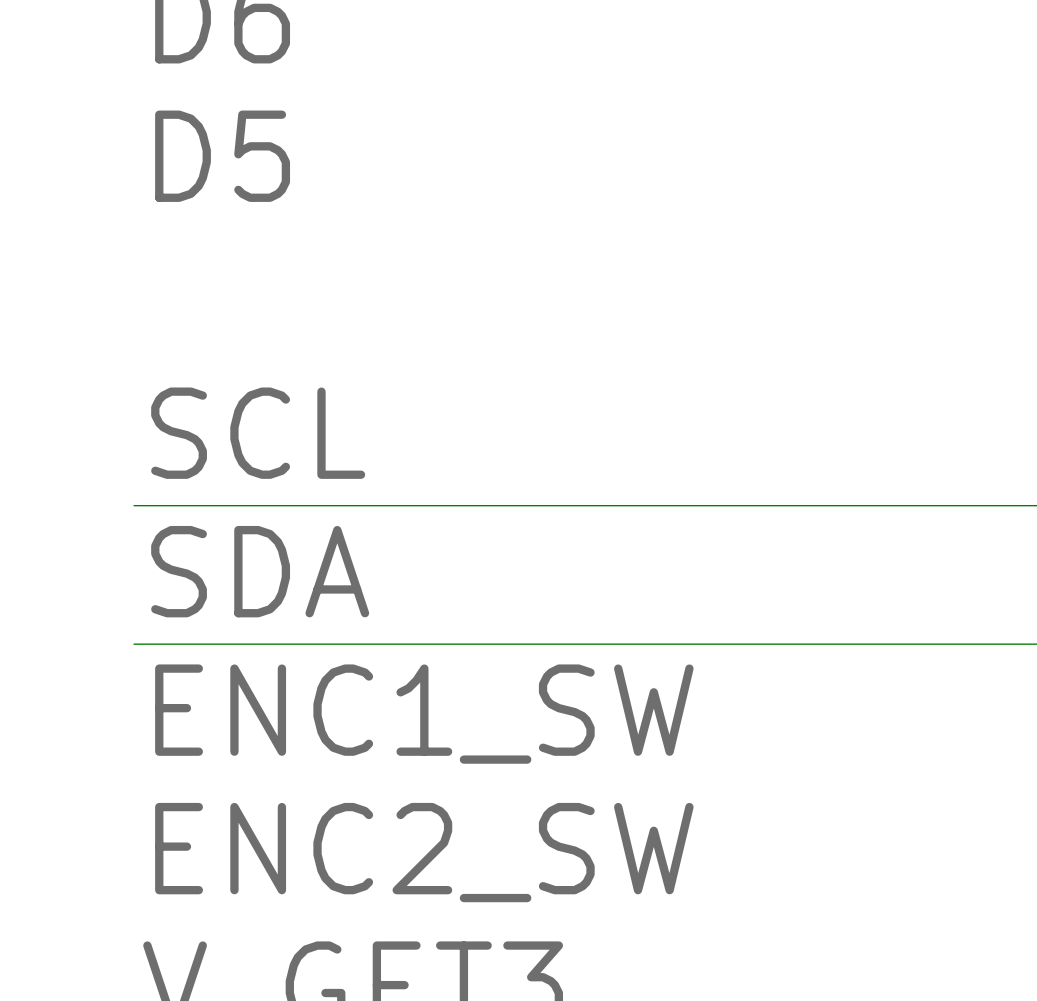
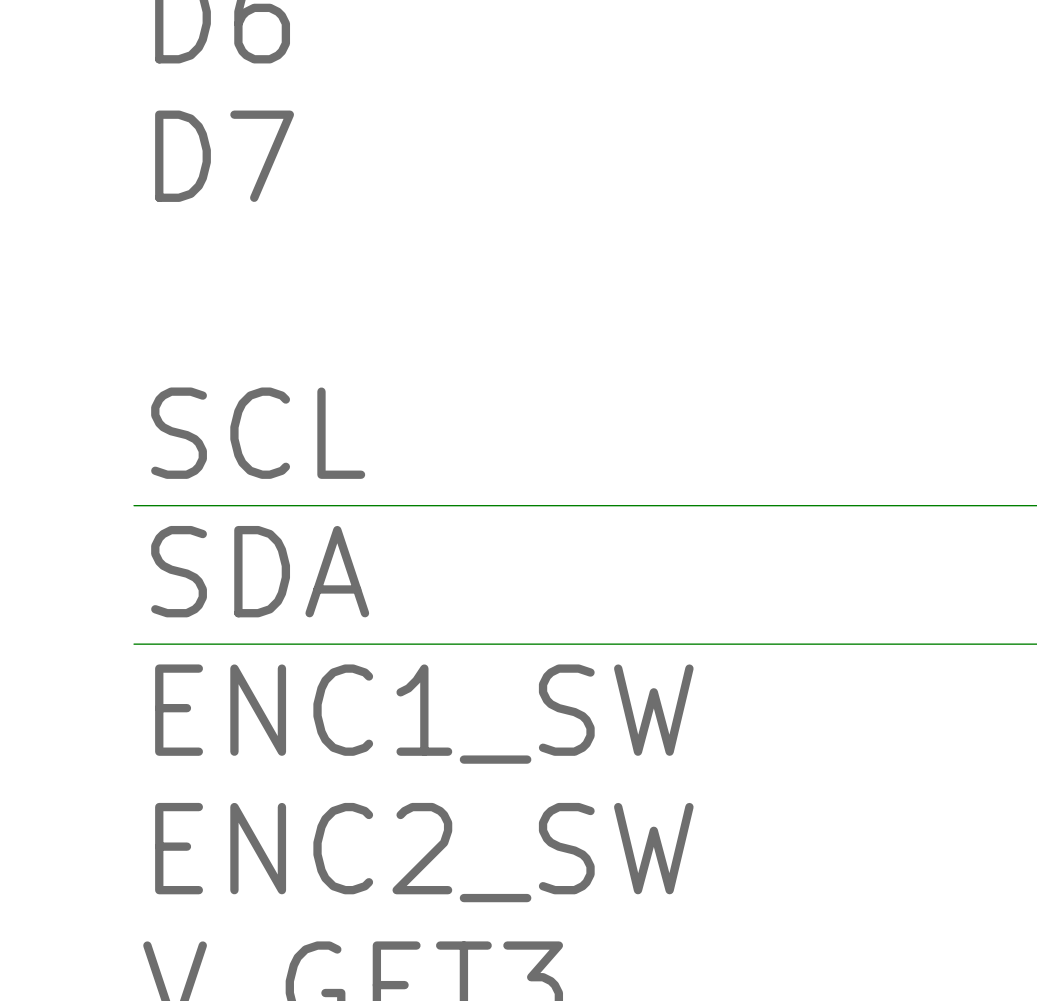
label: D5 (222, 156) -> D7 (224, 156)

